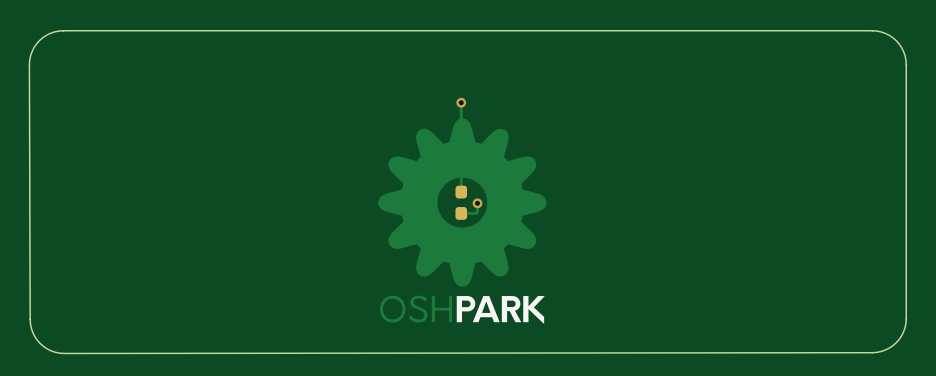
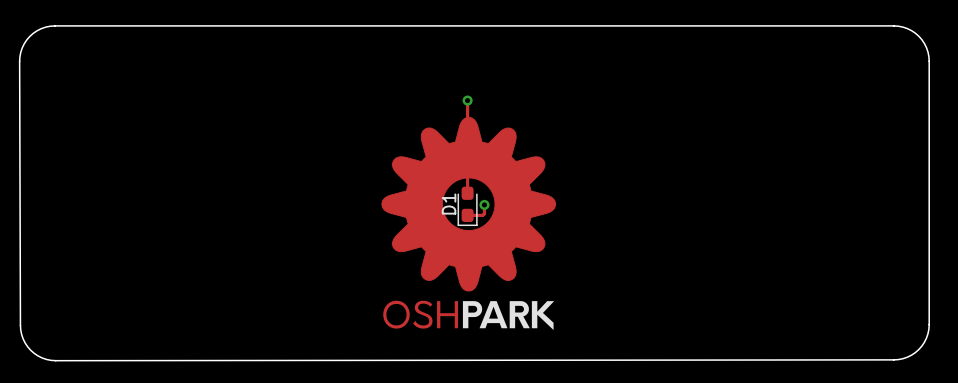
part: (461, 202) -> none
D1: none -> (467, 206)

